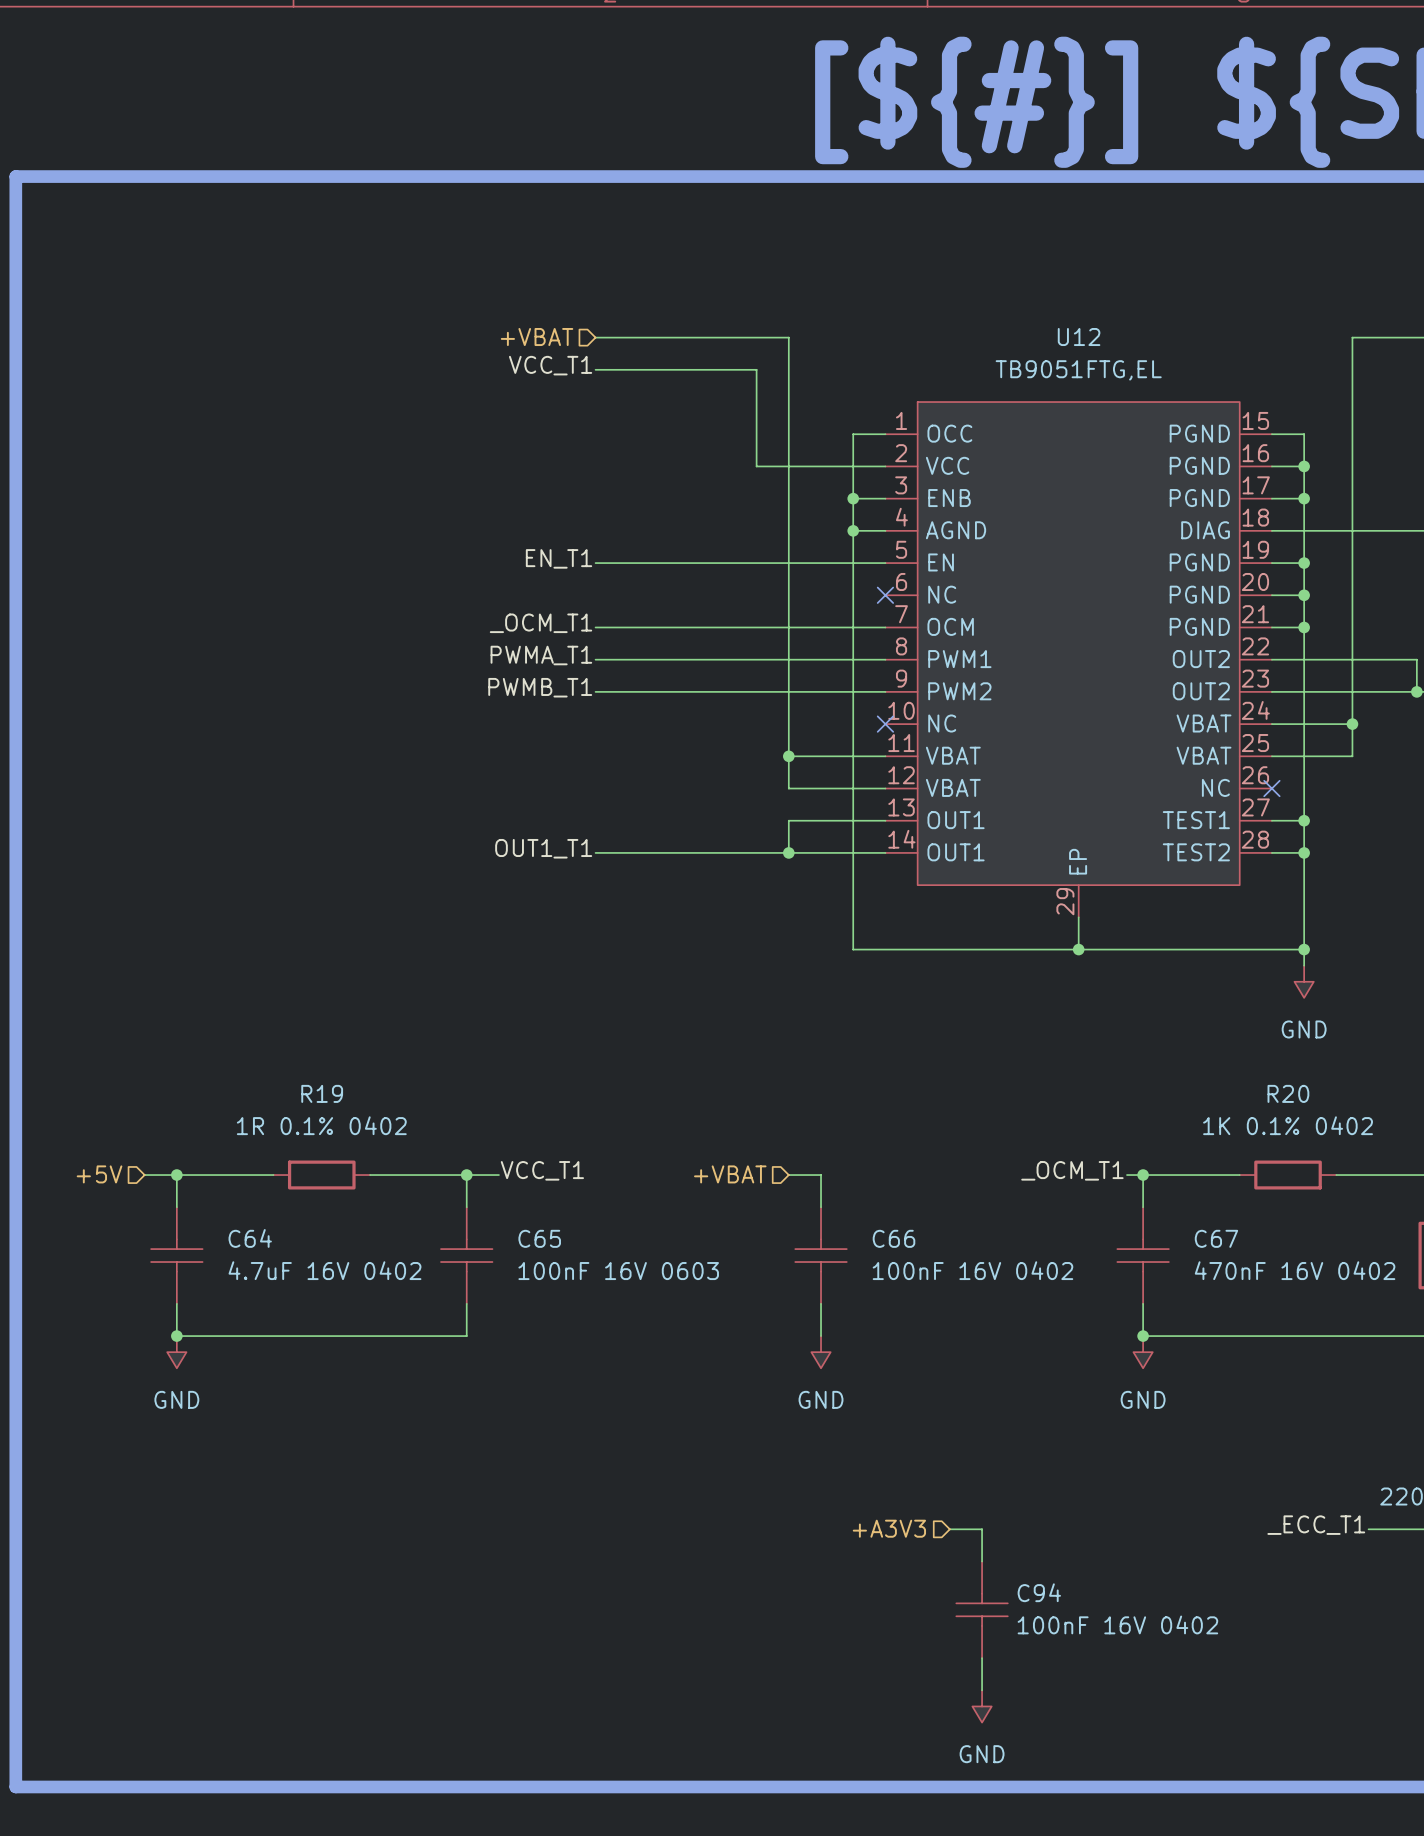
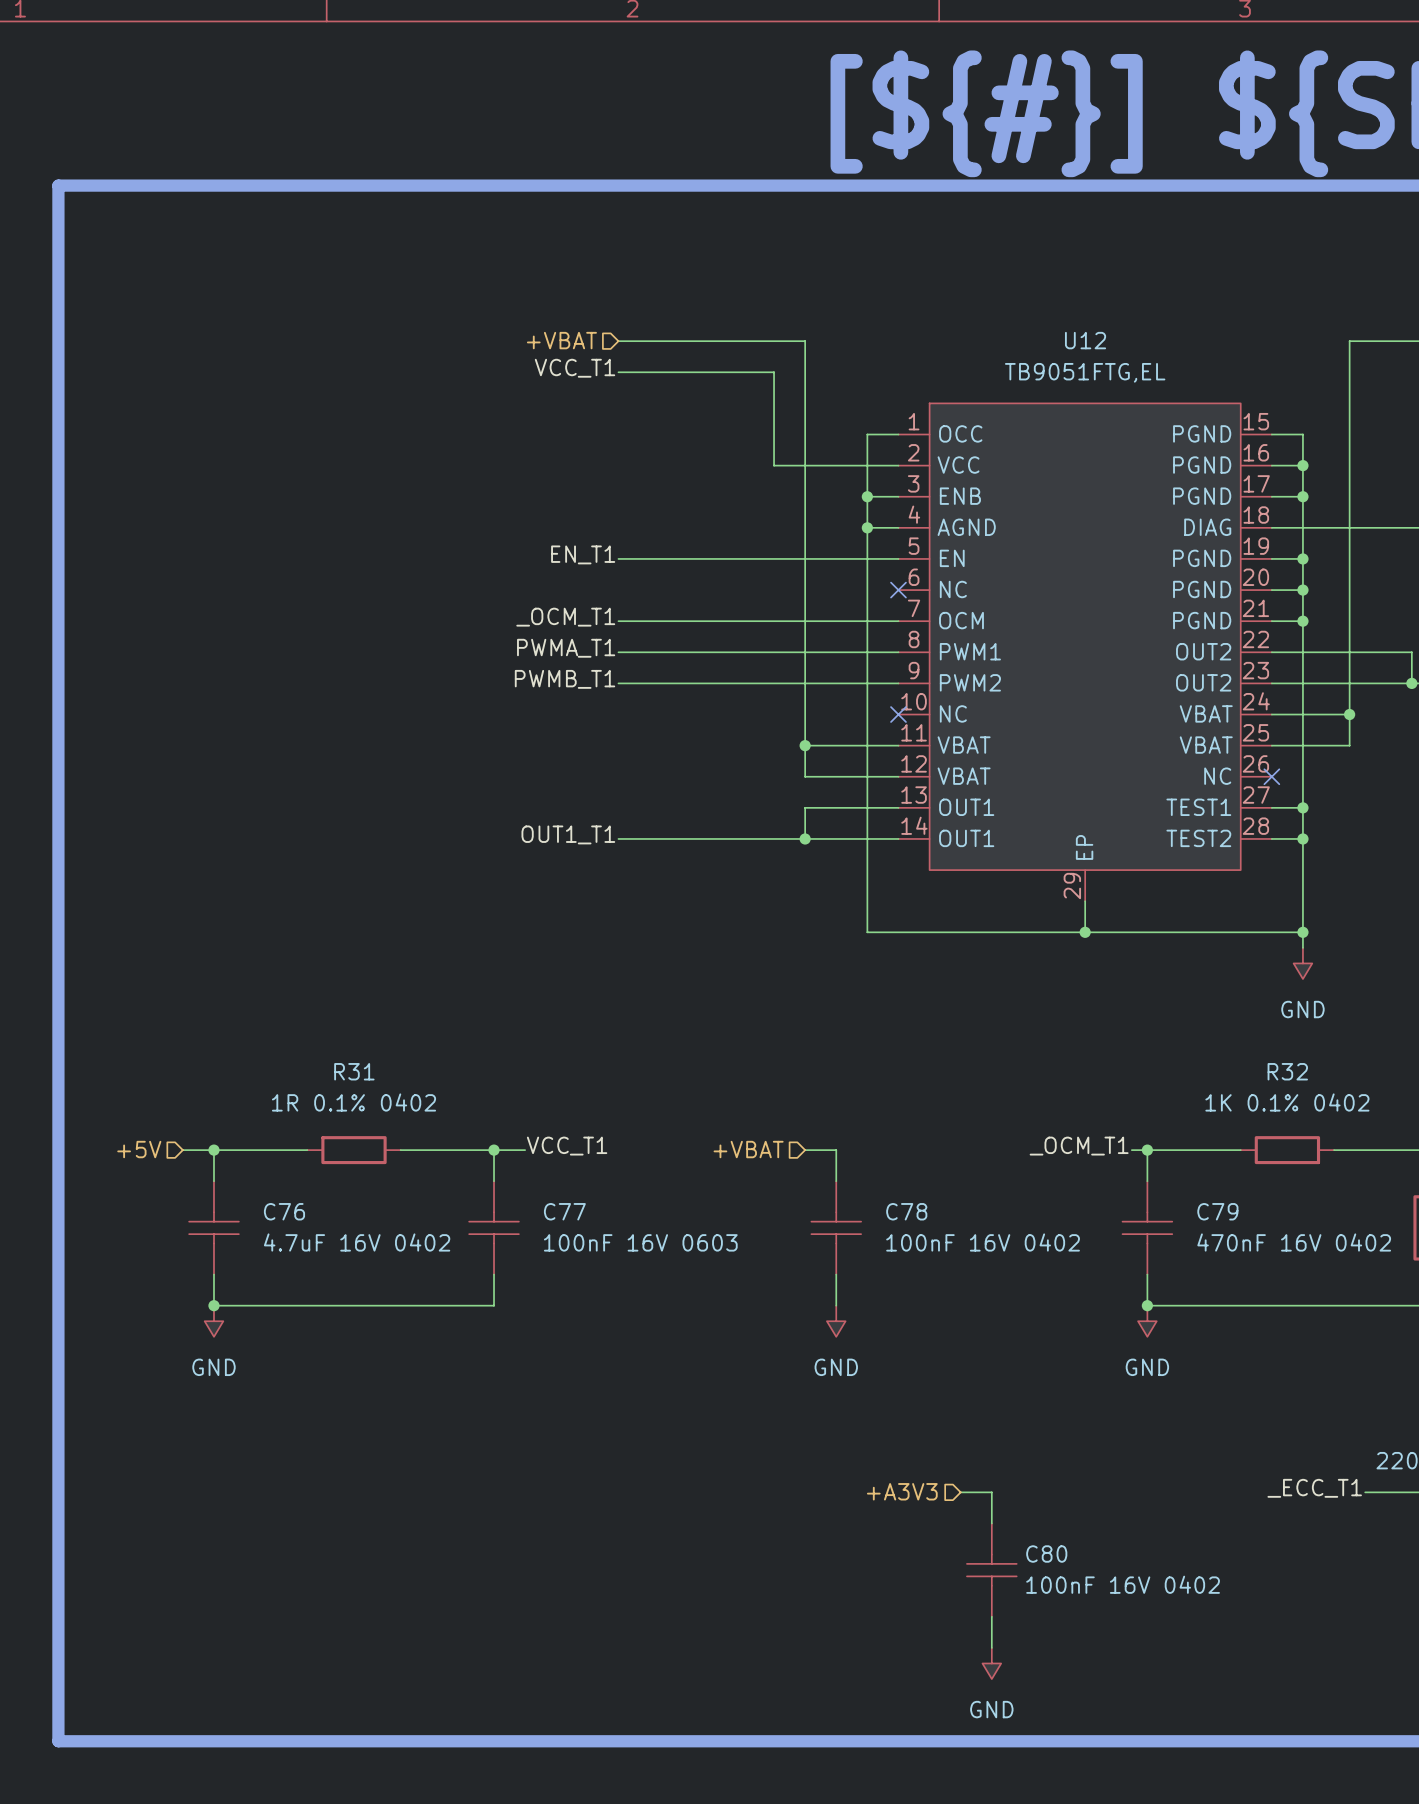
R19 name: R19 (322, 1093) -> R31 (354, 1071)
R20 name: R20 (1288, 1093) -> R32 (1287, 1071)
C64 name: C64 (250, 1238) -> C76 (284, 1211)
C65 name: C65 (539, 1238) -> C77 (564, 1211)
C66 name: C66 (893, 1238) -> C78 (906, 1211)
C67 name: C67 (1216, 1238) -> C79 (1217, 1211)
C94 name: C94 (1039, 1592) -> C80 (1046, 1554)

